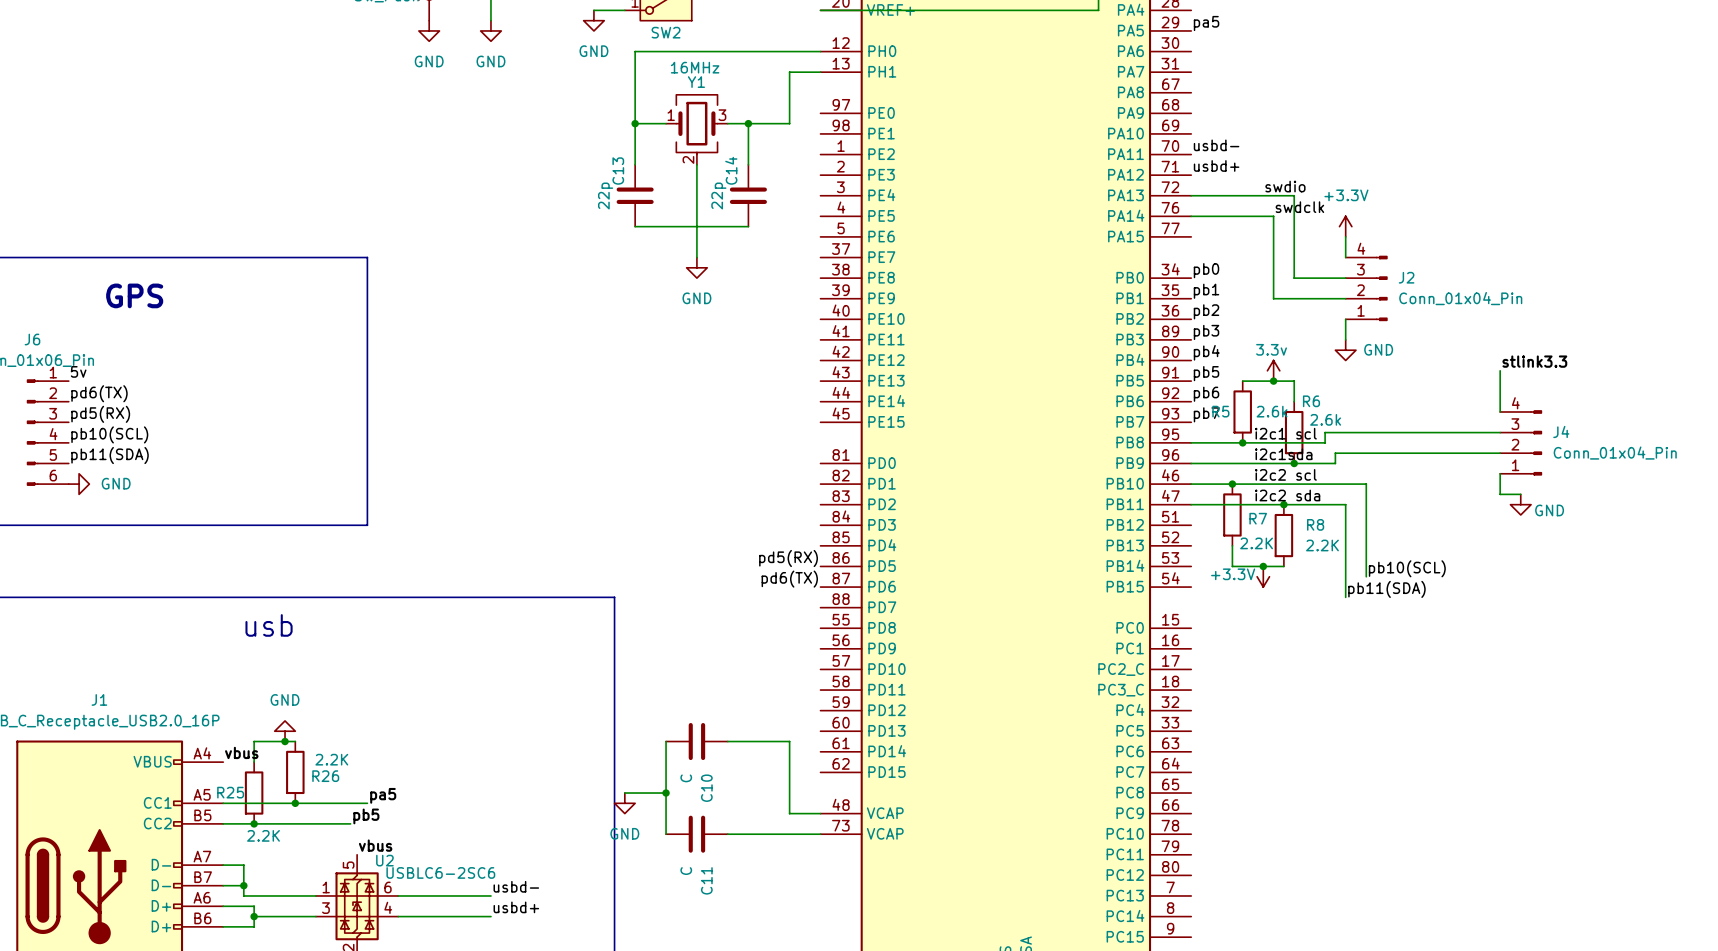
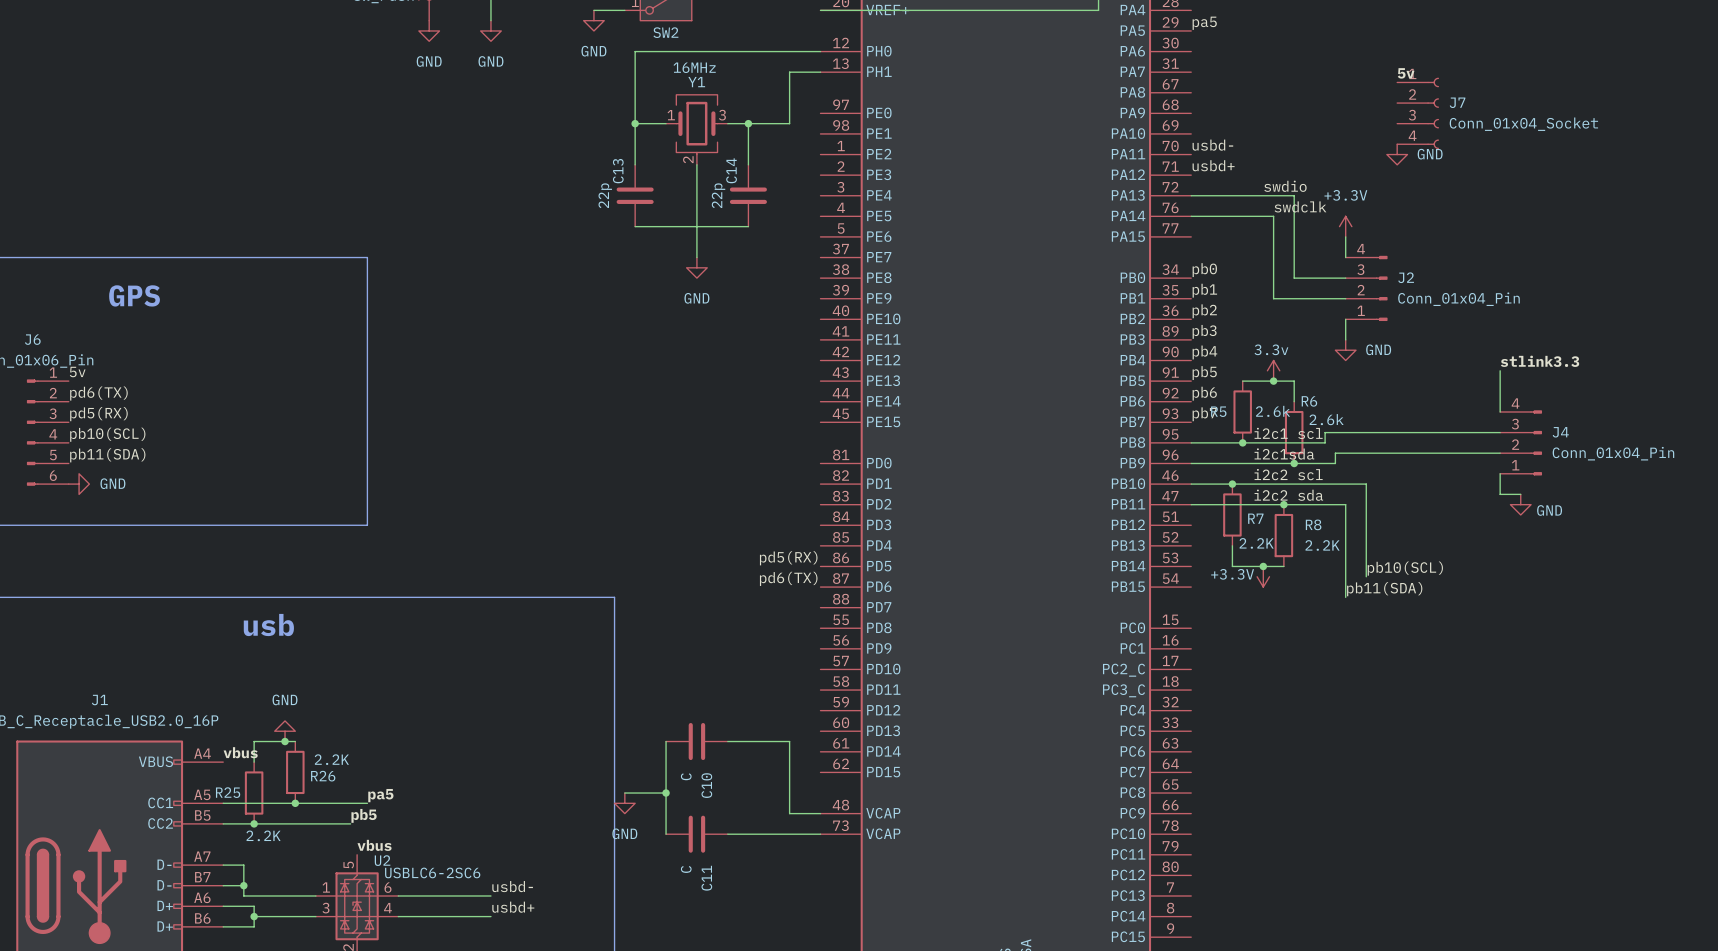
label: none -> 5v (1406, 73)
J7: none -> Conn_01x04_Socket (1418, 113)
power symbol: none -> GND (1397, 154)

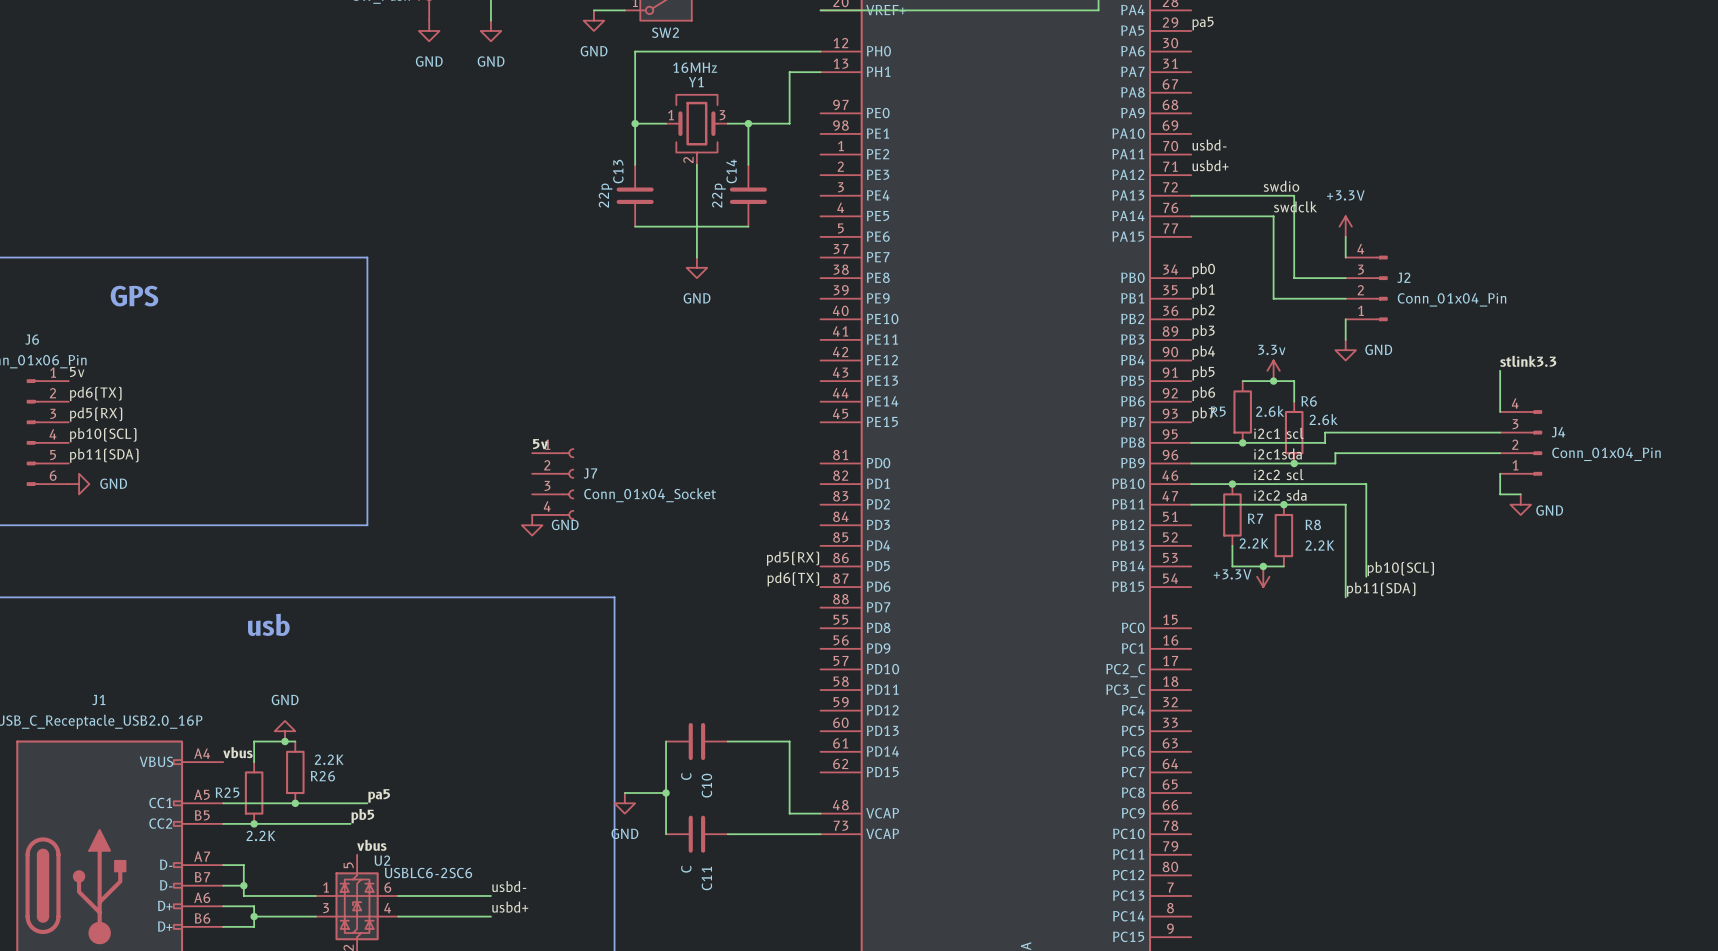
label: 5v (1406, 73) -> none
J7 position: (1418, 113) -> (553, 484)
power symbol: GND (1397, 154) -> none
label: none -> 5v (540, 444)
power symbol: none -> GND (532, 525)

